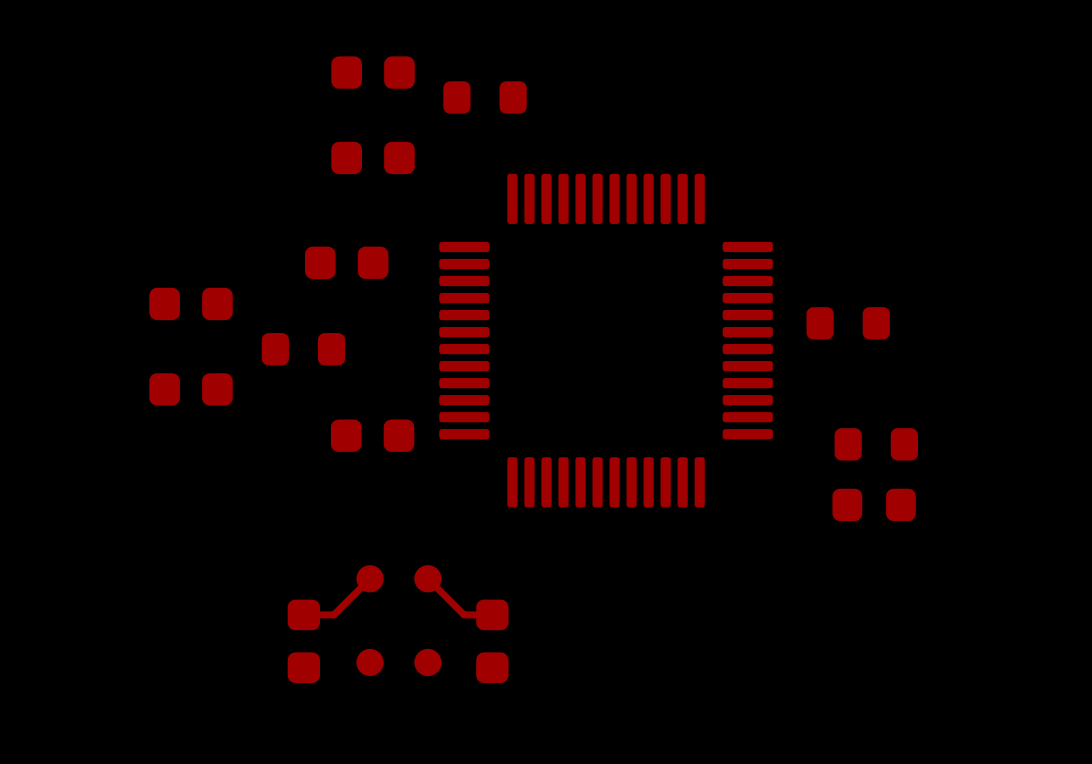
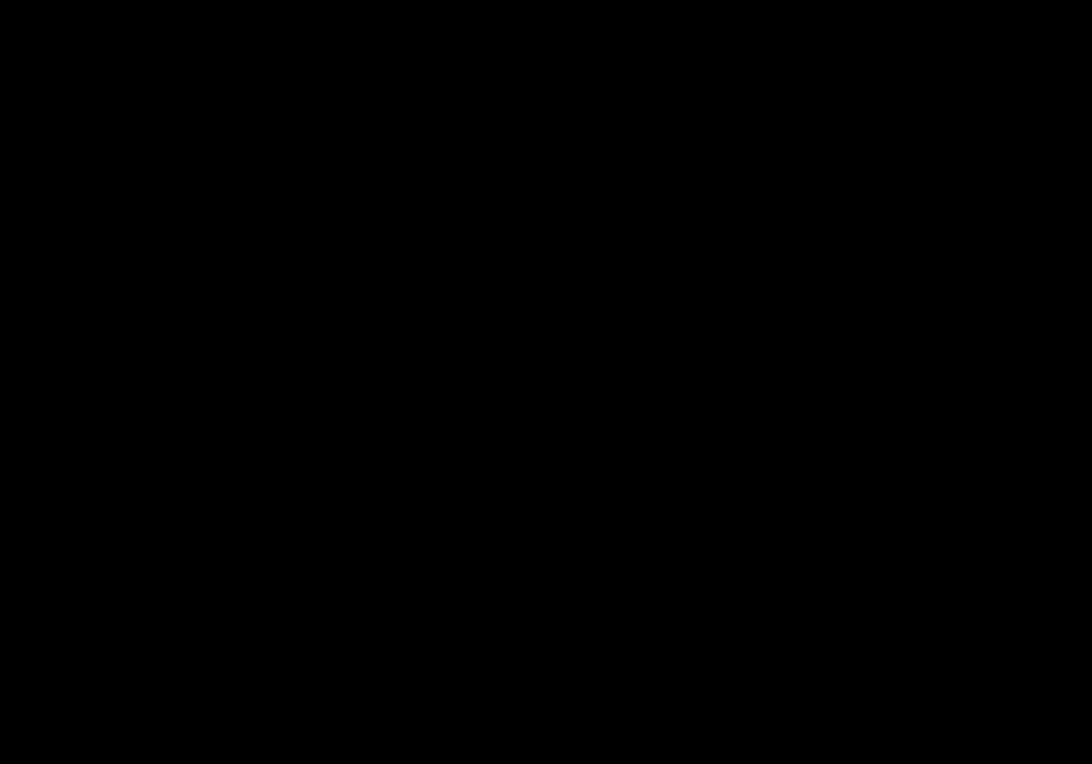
part: (373, 72) -> none
part: (485, 97) -> none
part: (373, 158) -> none
part: (346, 262) -> none
part: (191, 303) -> none
part: (848, 323) -> none
part: (606, 340) -> none
part: (303, 349) -> none
part: (191, 389) -> none
part: (372, 435) -> none
part: (876, 444) -> none
part: (874, 504) -> none
top track: (370, 578) (333, 614) (303, 614) -> none
top track: (427, 578) (464, 614) (492, 614) -> none
part: (398, 620) -> none
part: (303, 641) -> none
part: (492, 641) -> none

